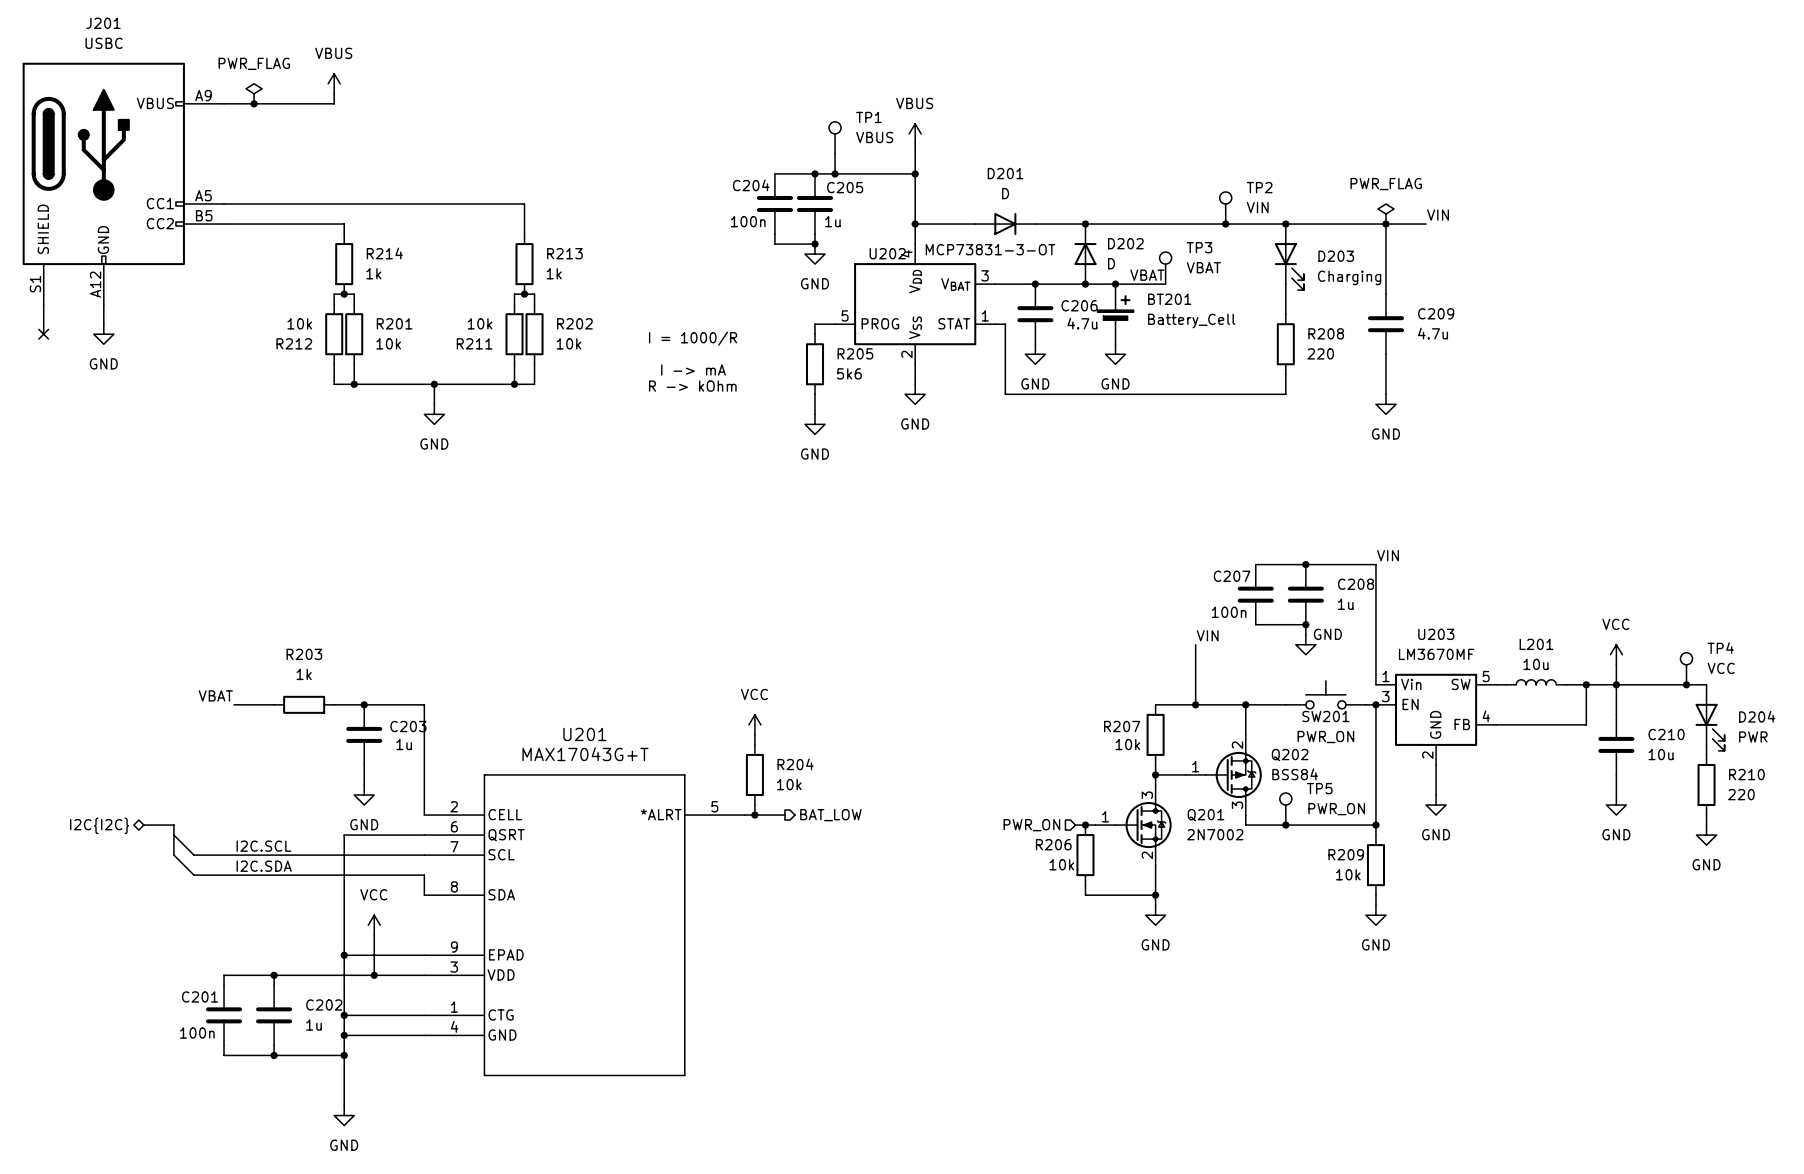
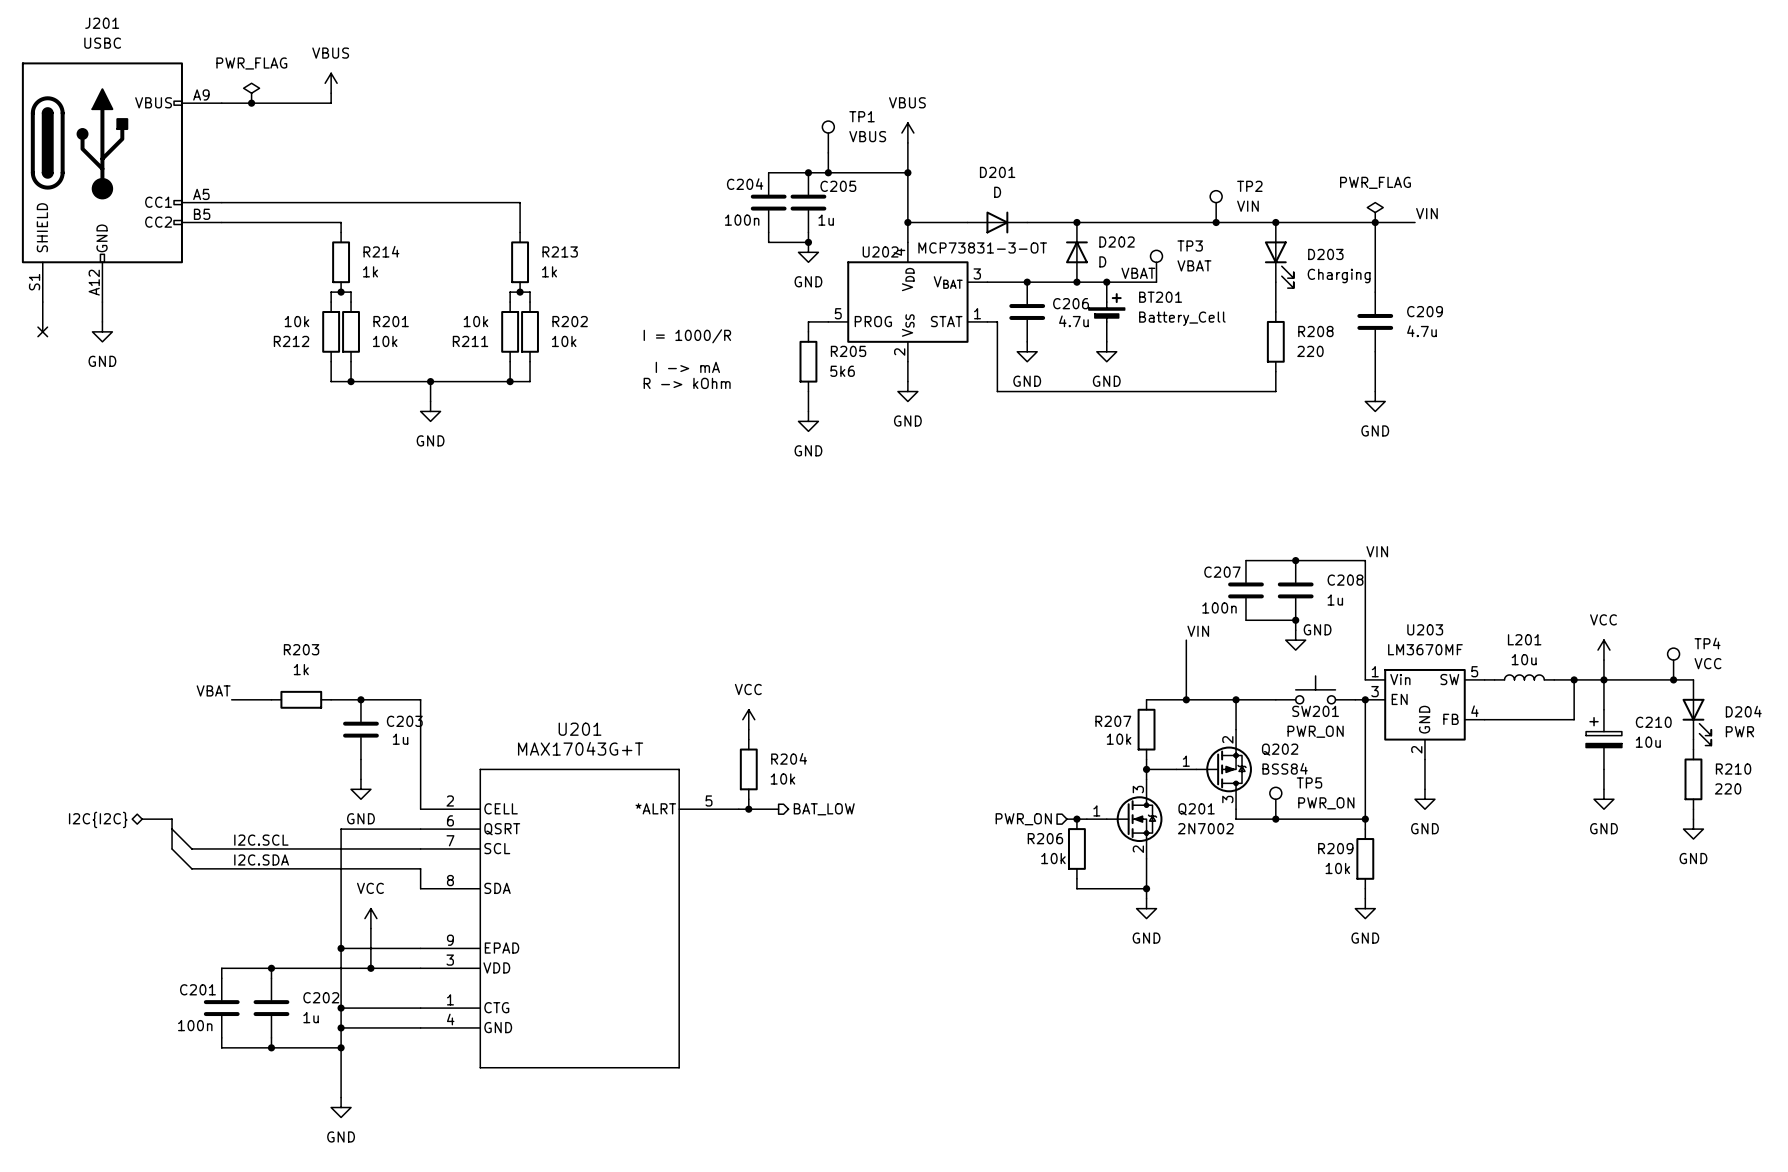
C210 symbol: [1598, 714, 1635, 775] -> [1586, 709, 1622, 770]

